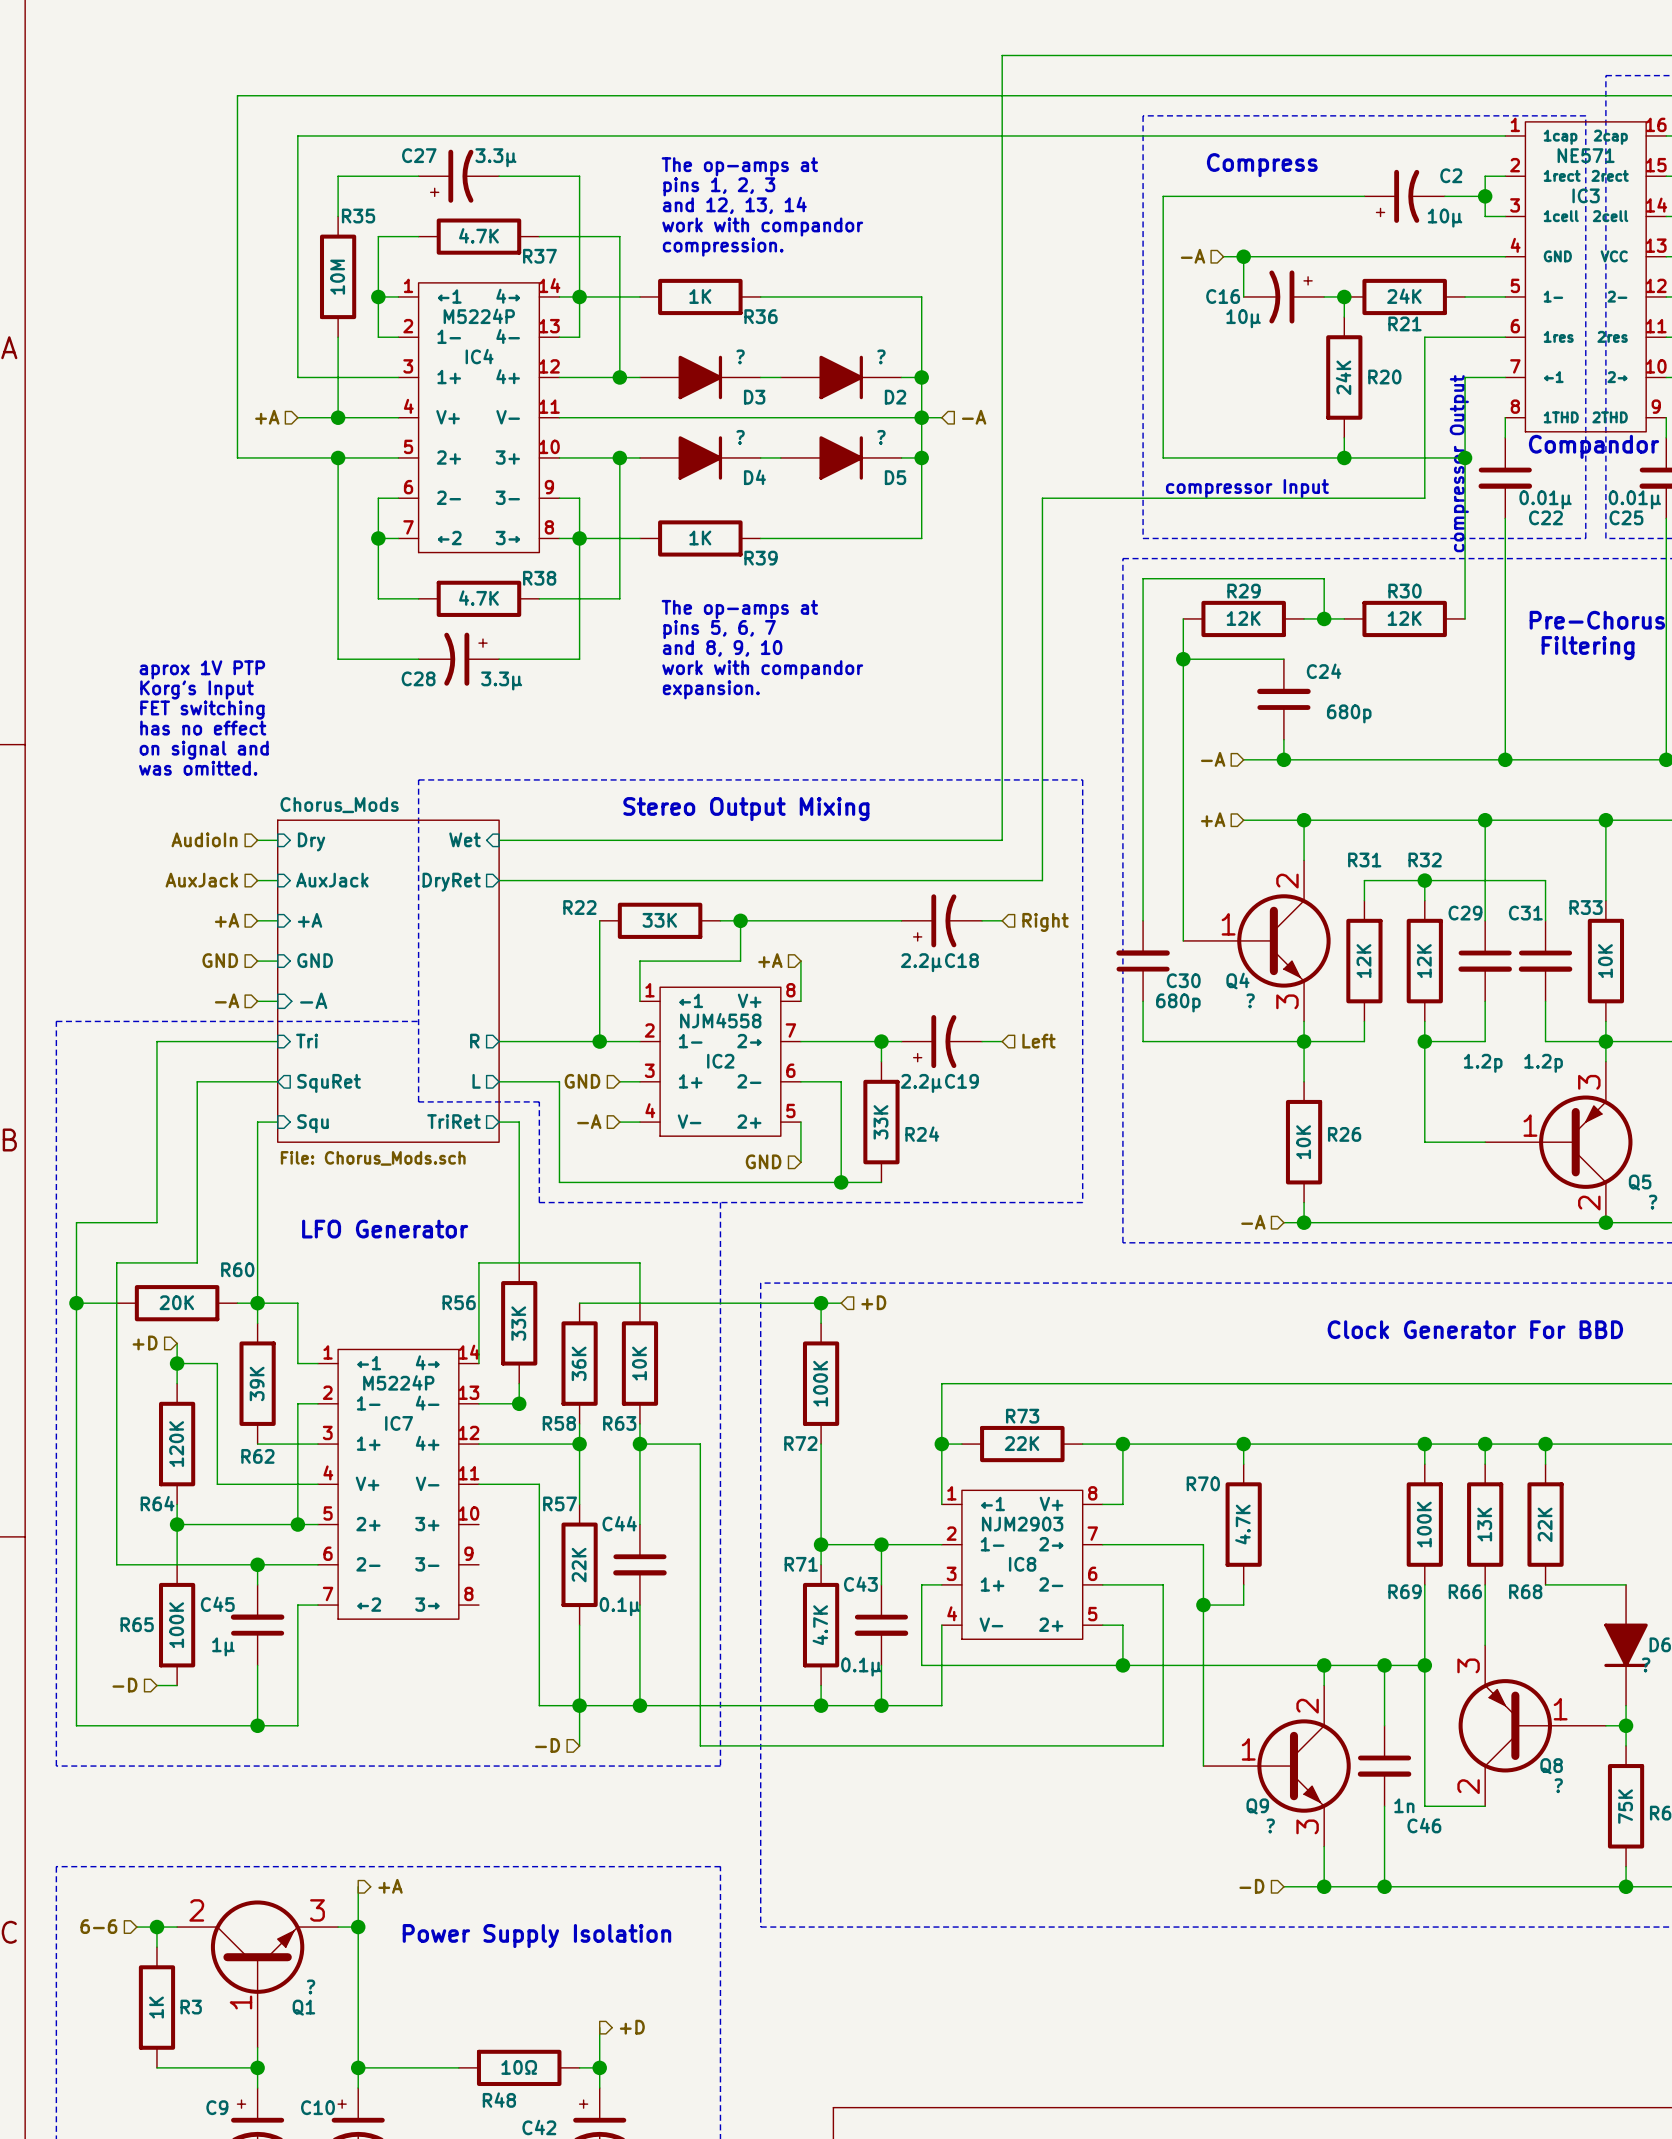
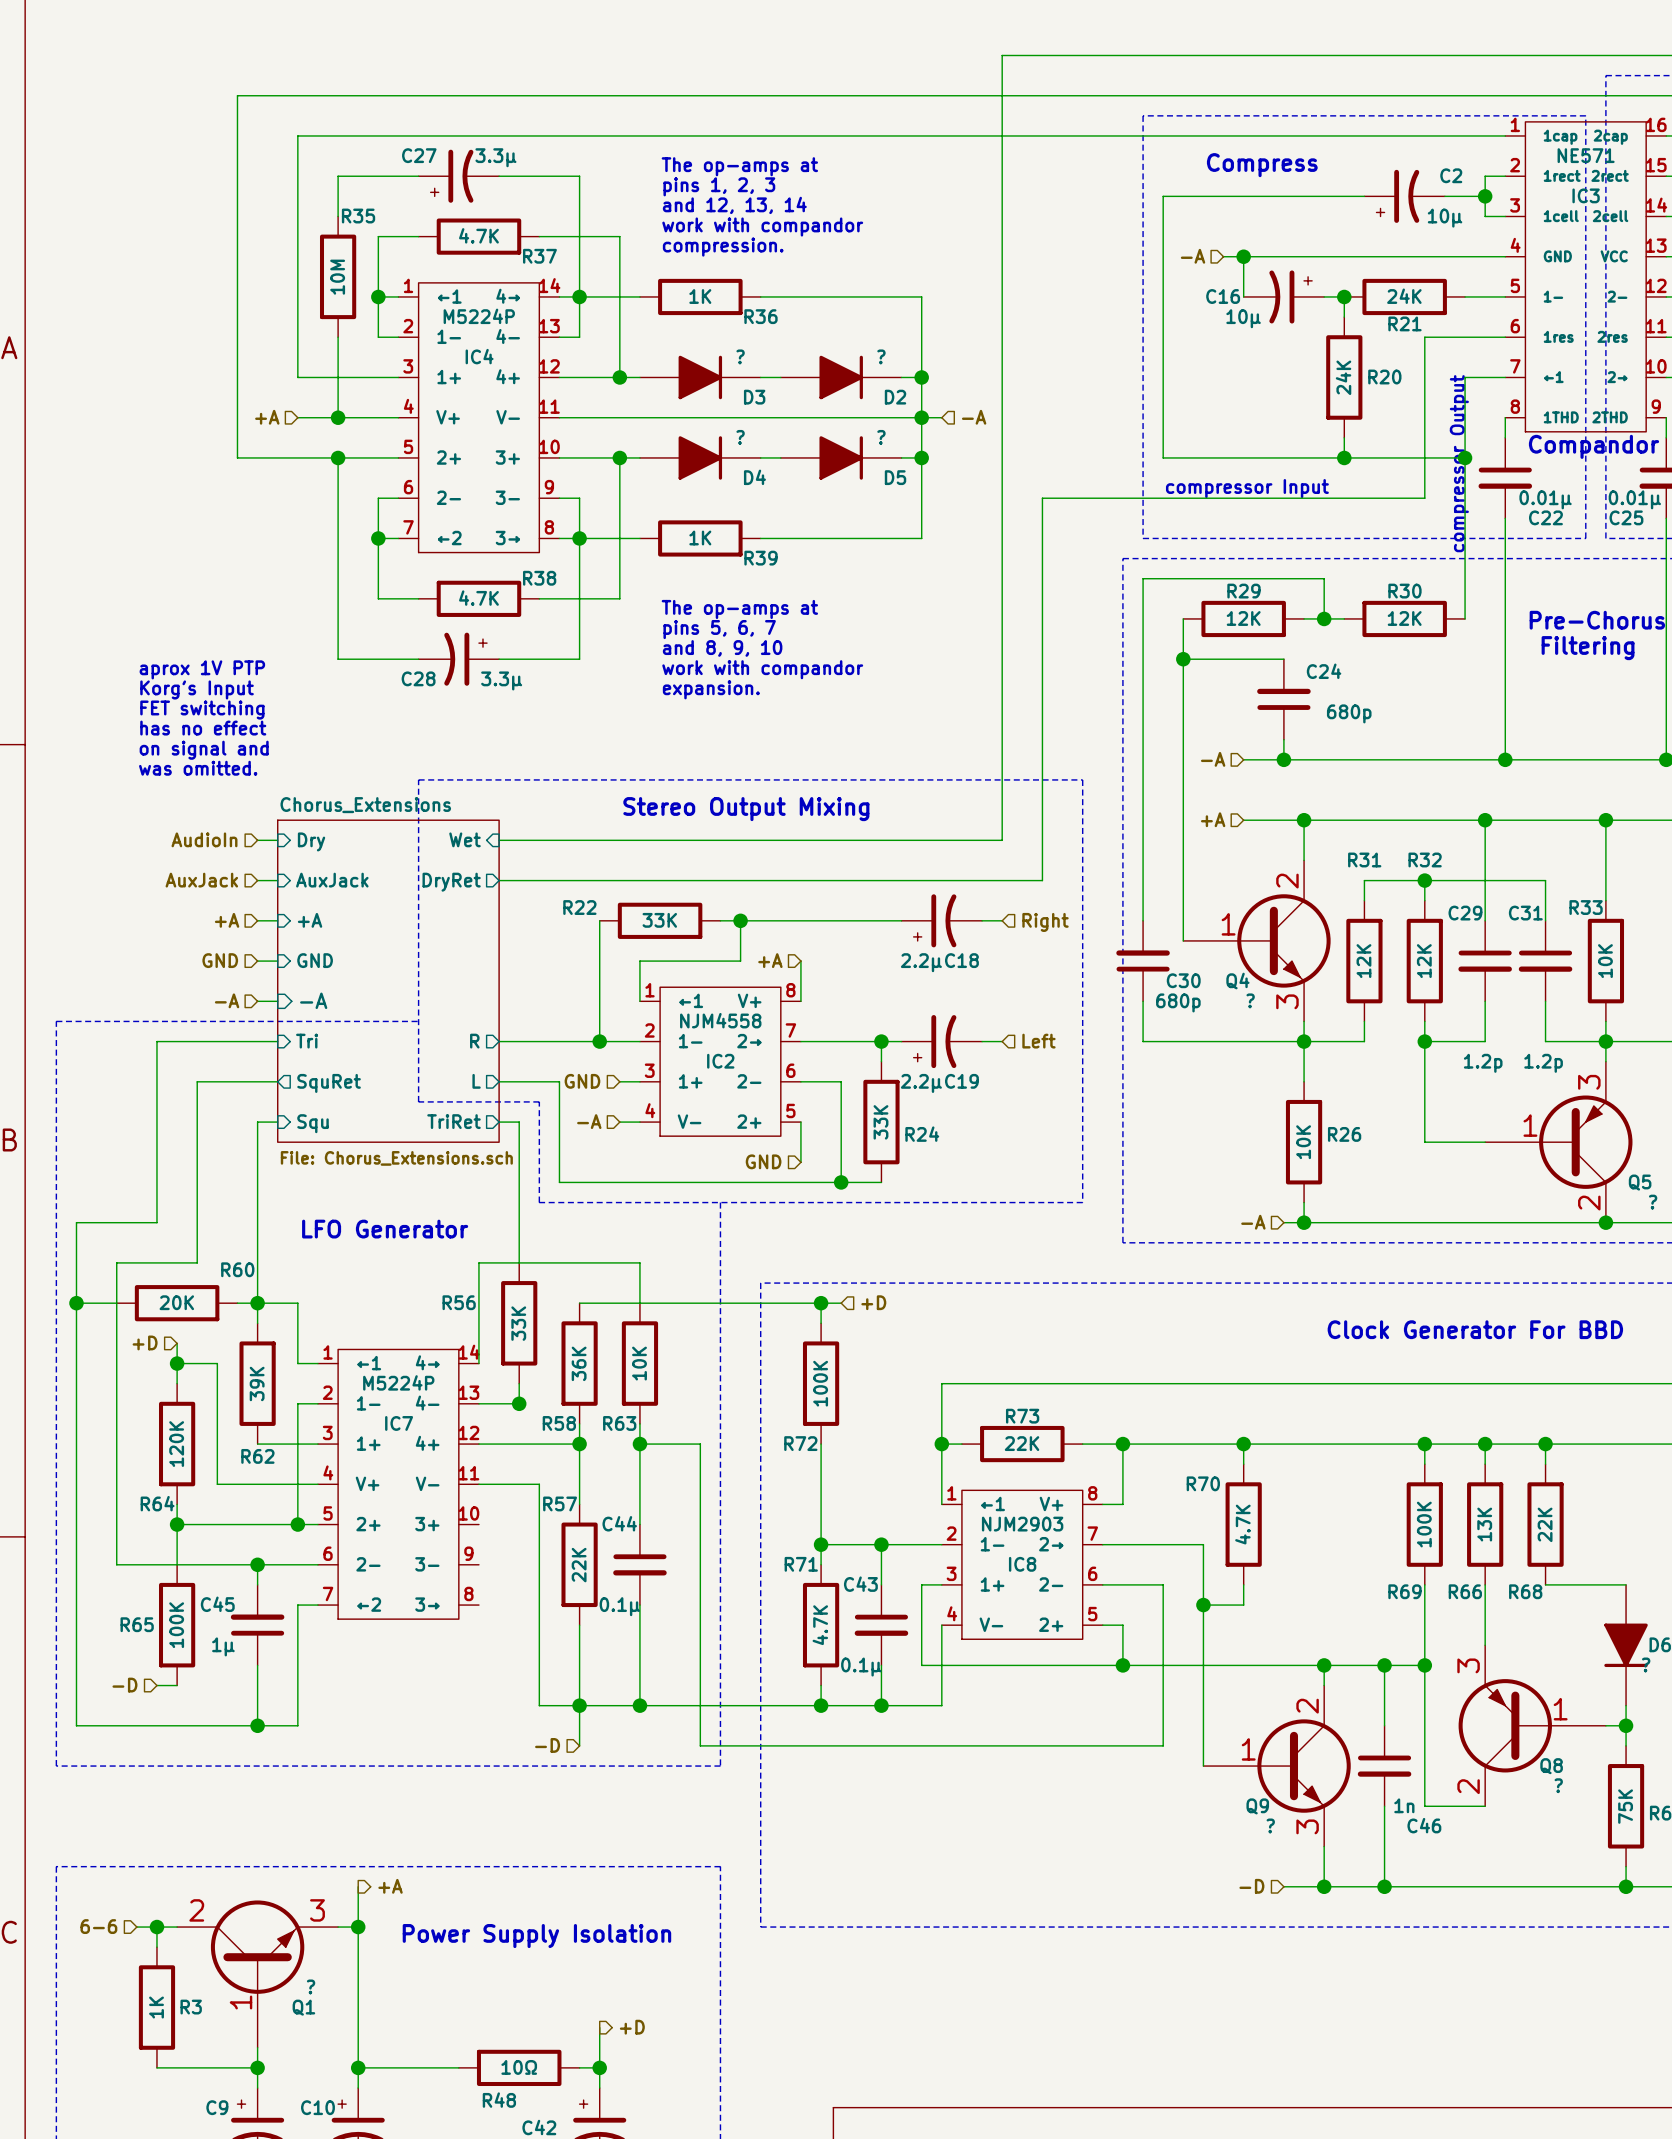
sheet Chorus_Mods name: Chorus_Mods (339, 805) -> Chorus_Extensions (365, 805)
sheet Chorus_Mods value: File: Chorus_Mods.sch (373, 1158) -> File: Chorus_Extensions.sch (396, 1158)

